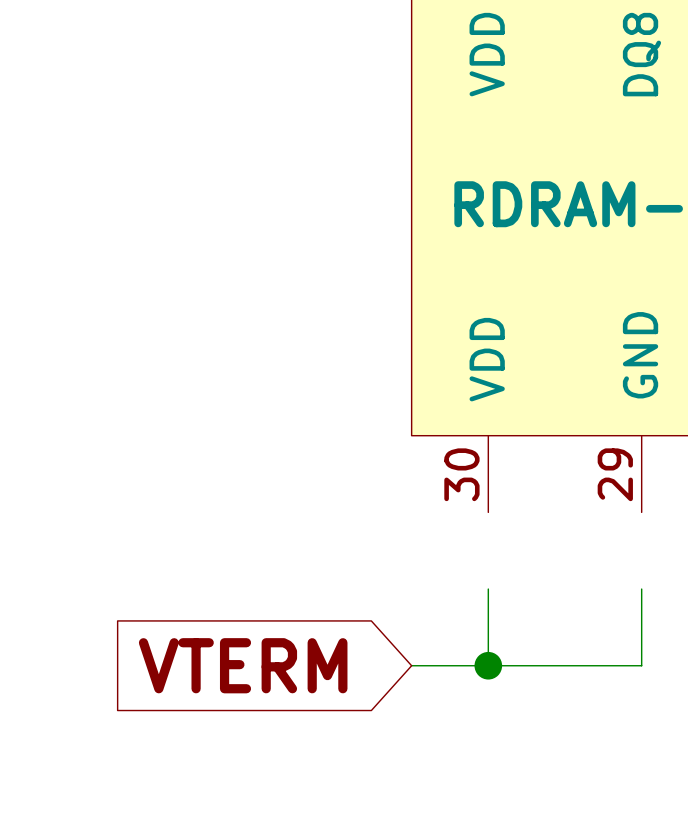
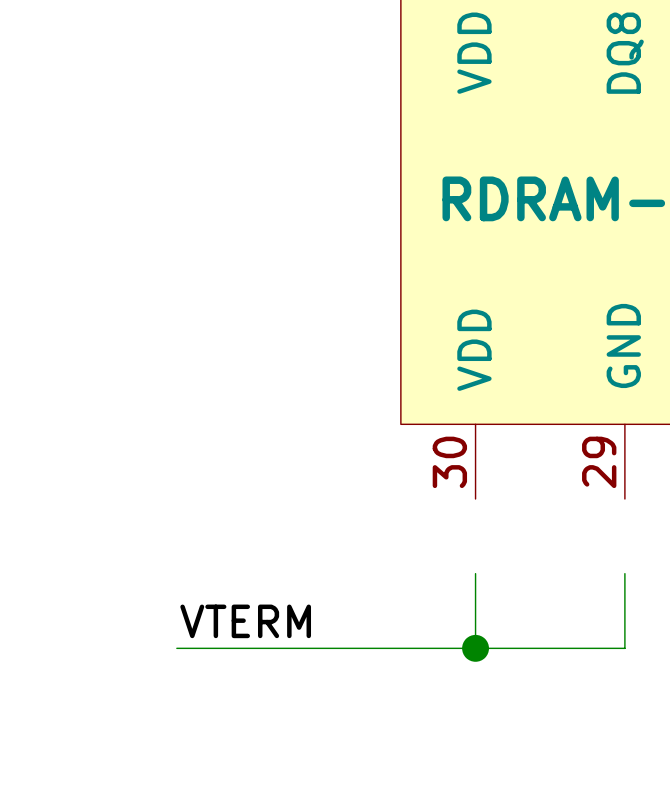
label: none -> VTERM (245, 621)
wire: none -> (176, 648) (400, 648)
global label: VTERM (243, 665) -> none

